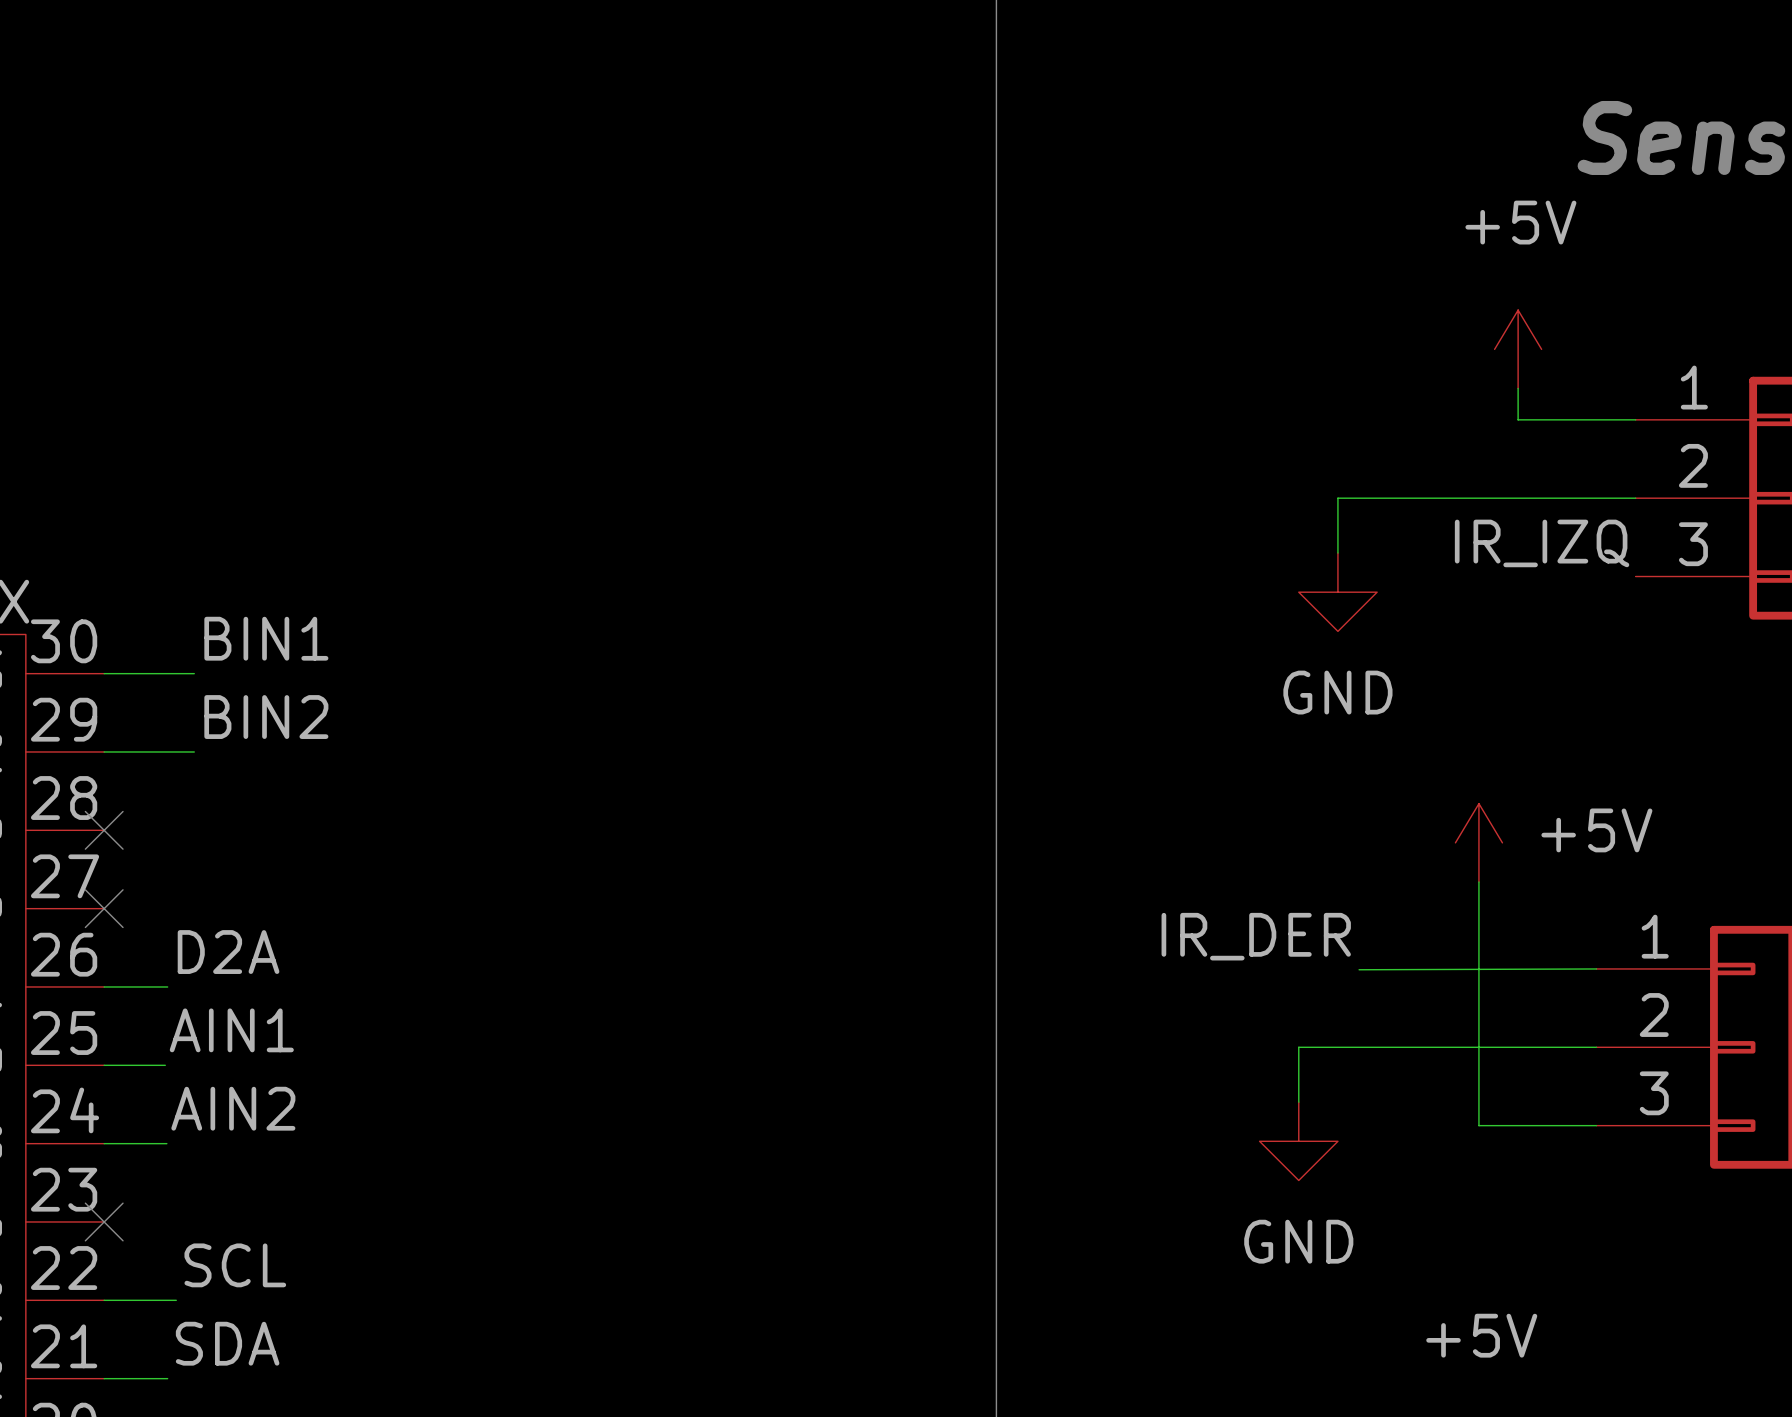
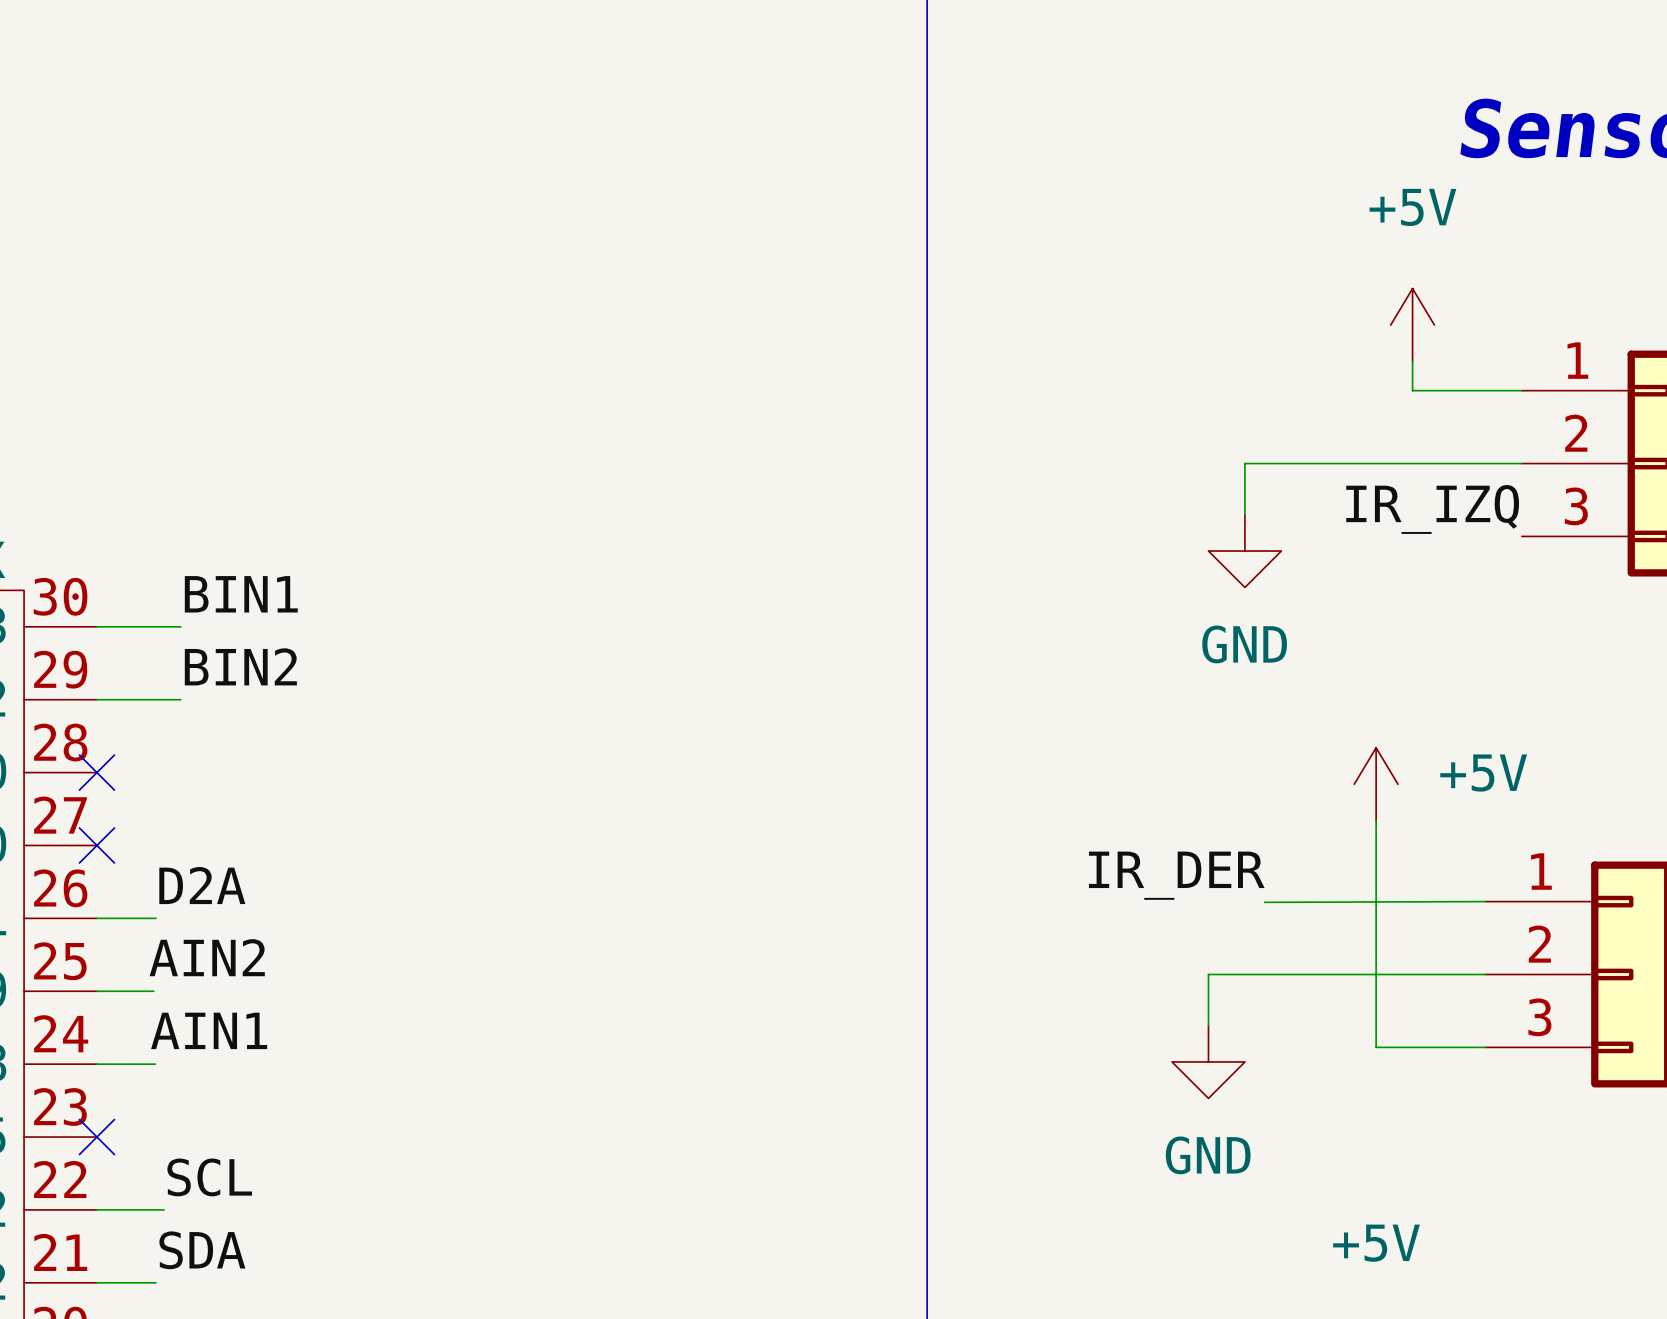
label: AIN1 (231, 1030) -> AIN2 (207, 957)
label: AIN2 (233, 1108) -> AIN1 (209, 1030)

